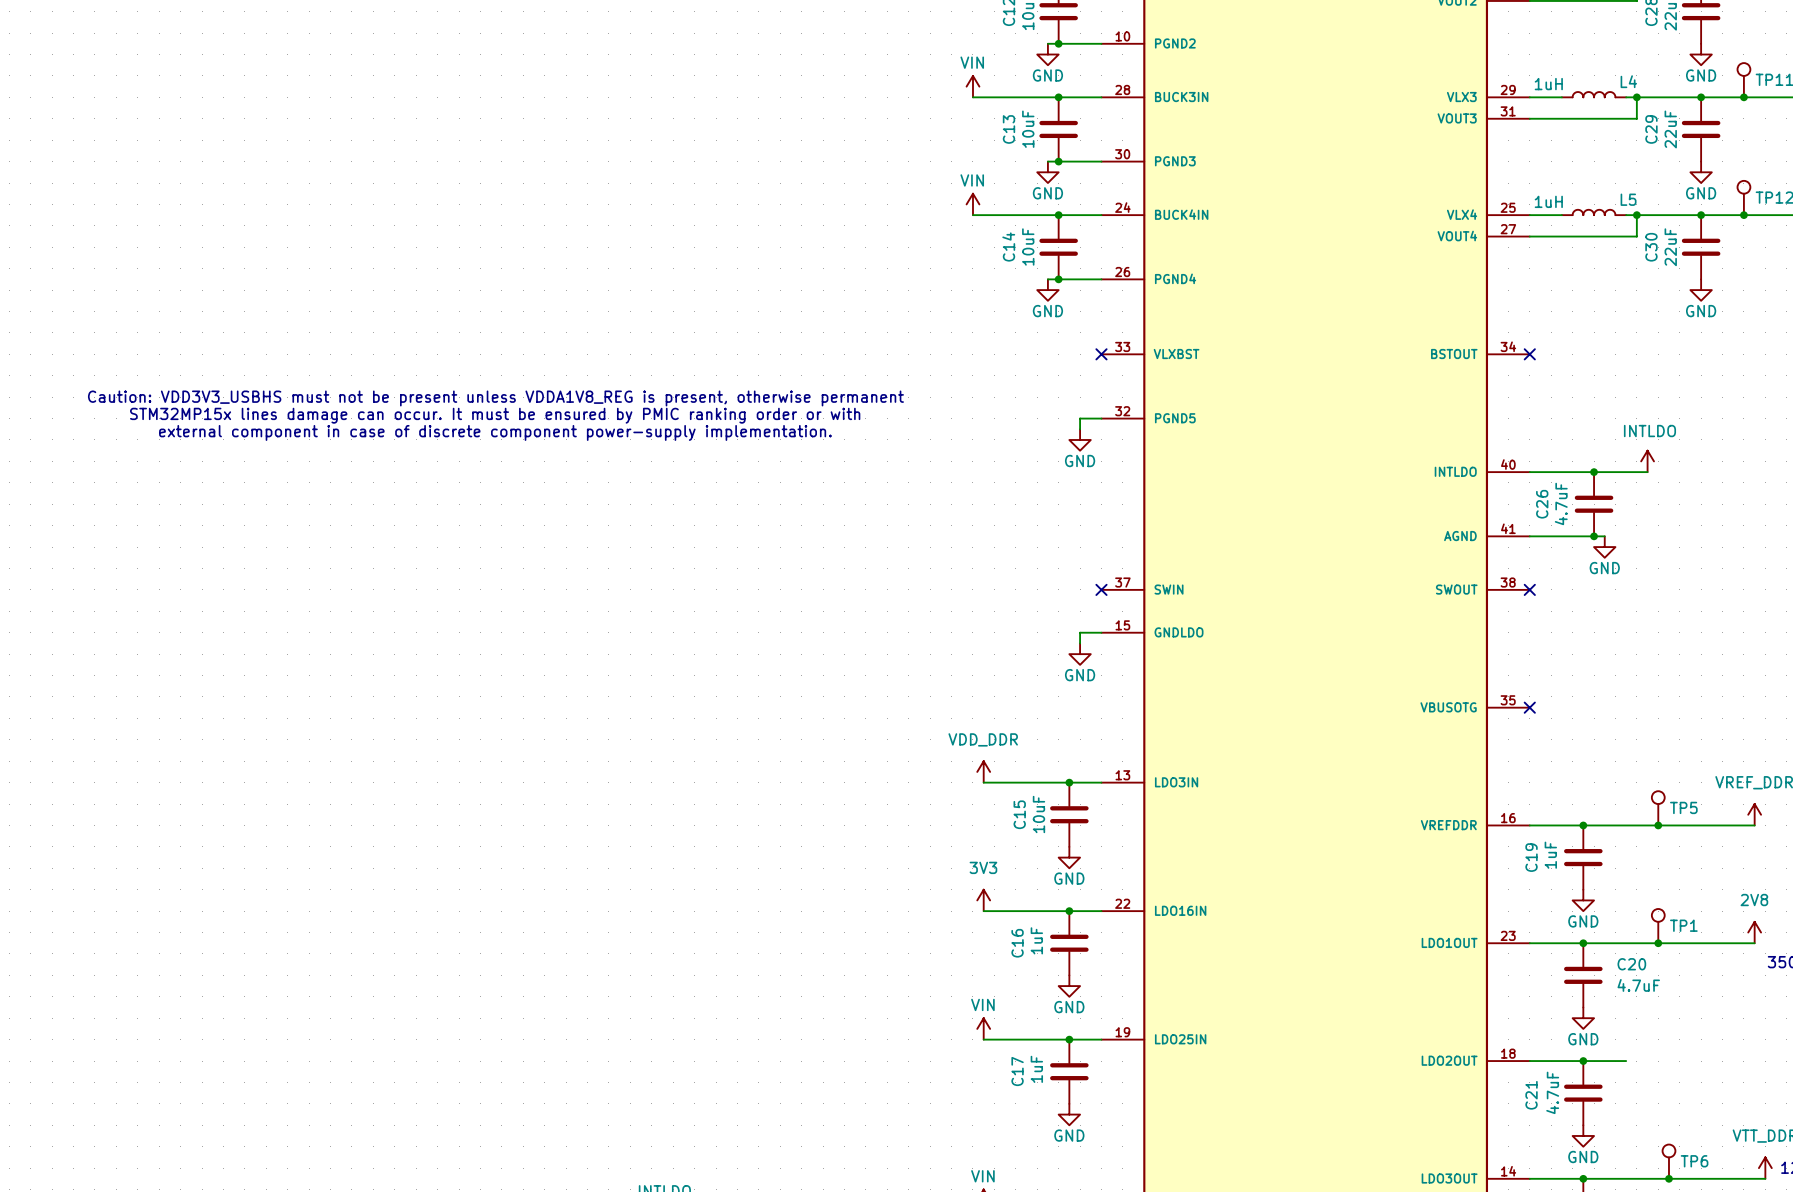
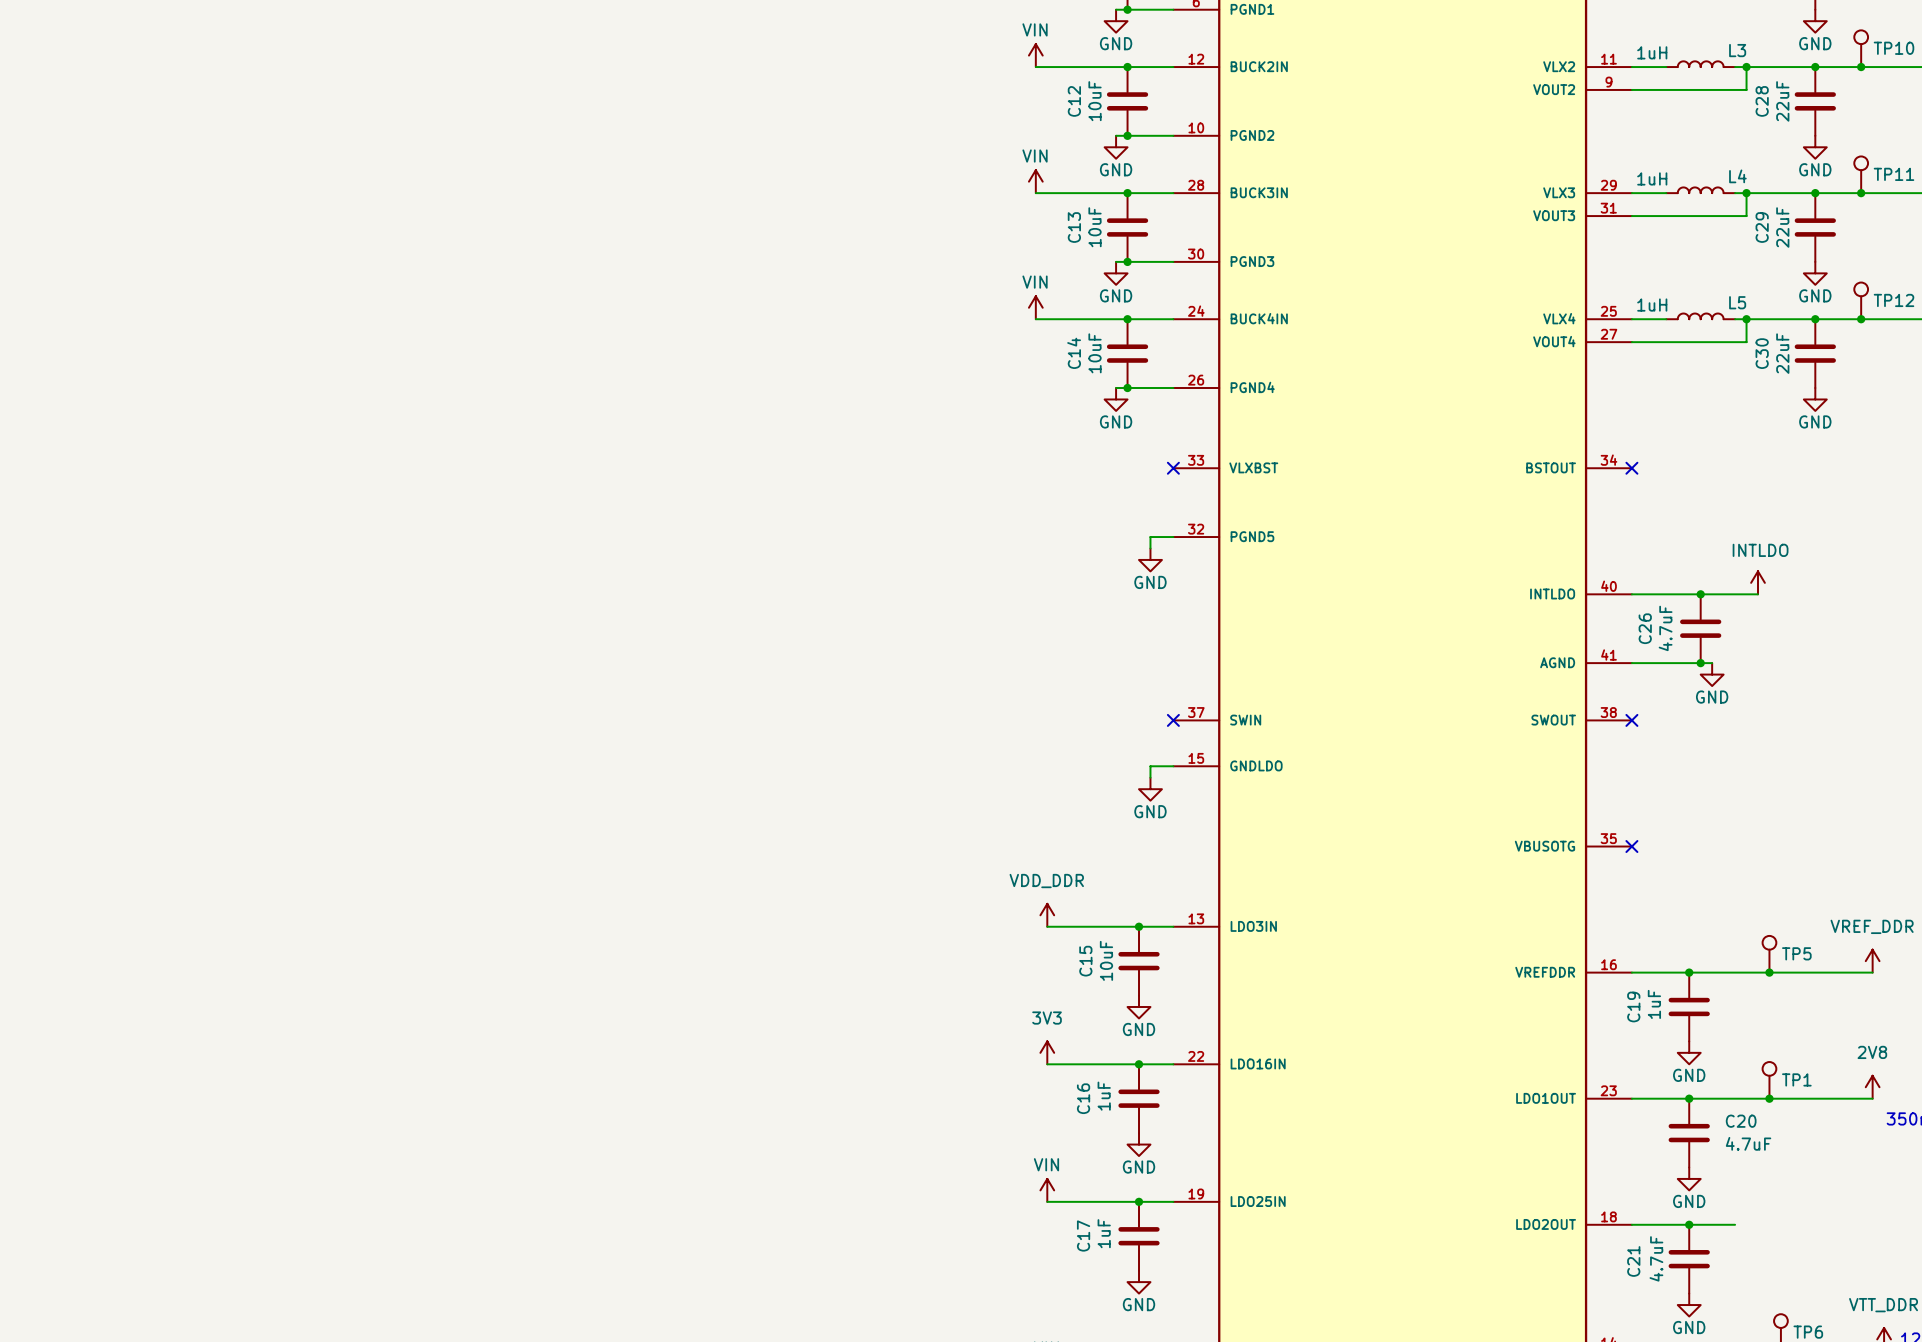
text: Caution: VDD3V3_USBHS must not be present unless VDDA1V8_REG is present, otherwise permanent (495, 398) -> none
text: STM32MP15x lines damage can occur. It must be ensured by PMIC ranking order or with (495, 415) -> none
text: external component in case of discrete component power-supply implementation. (495, 432) -> none

